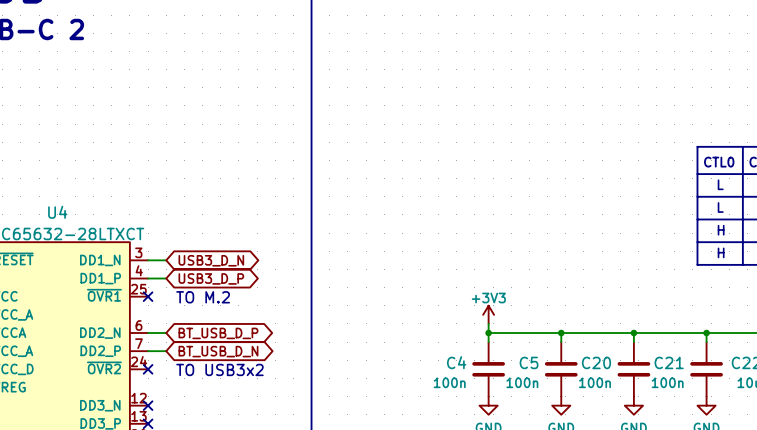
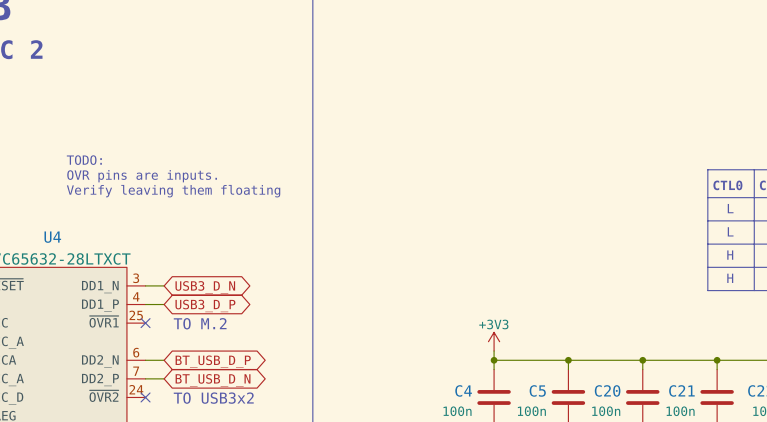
text: none -> TODO: (84, 160)
text: none -> OVR pins are inputs. (142, 176)
text: none -> Verify leaving them floating (173, 191)

